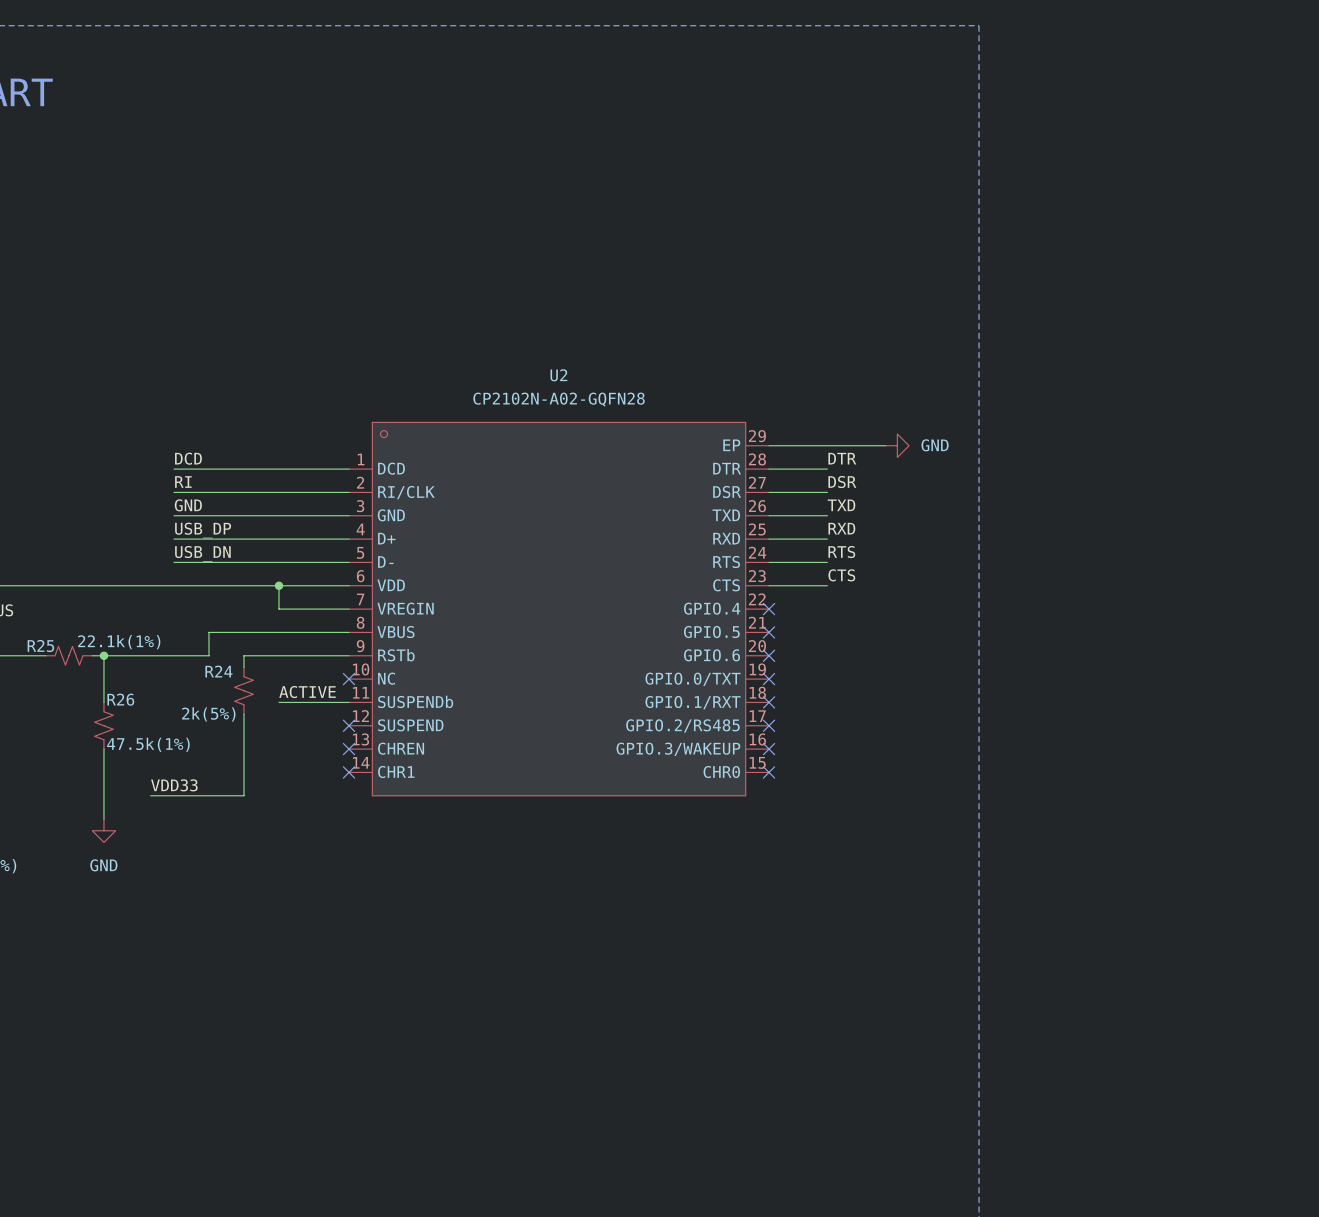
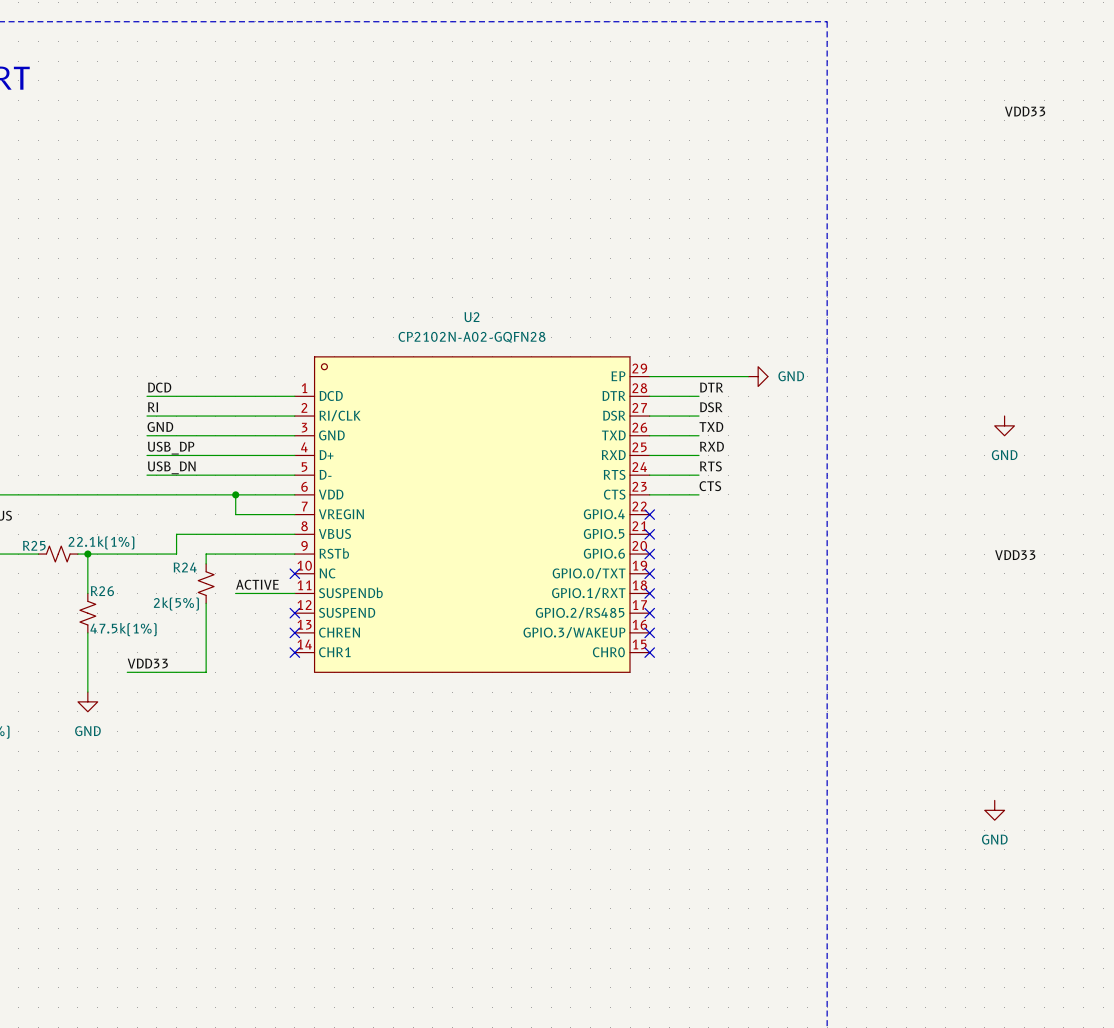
label: none -> VDD33 (1025, 111)
power symbol: none -> GND (1004, 425)
label: none -> VDD33 (1015, 555)
power symbol: none -> GND (994, 810)

